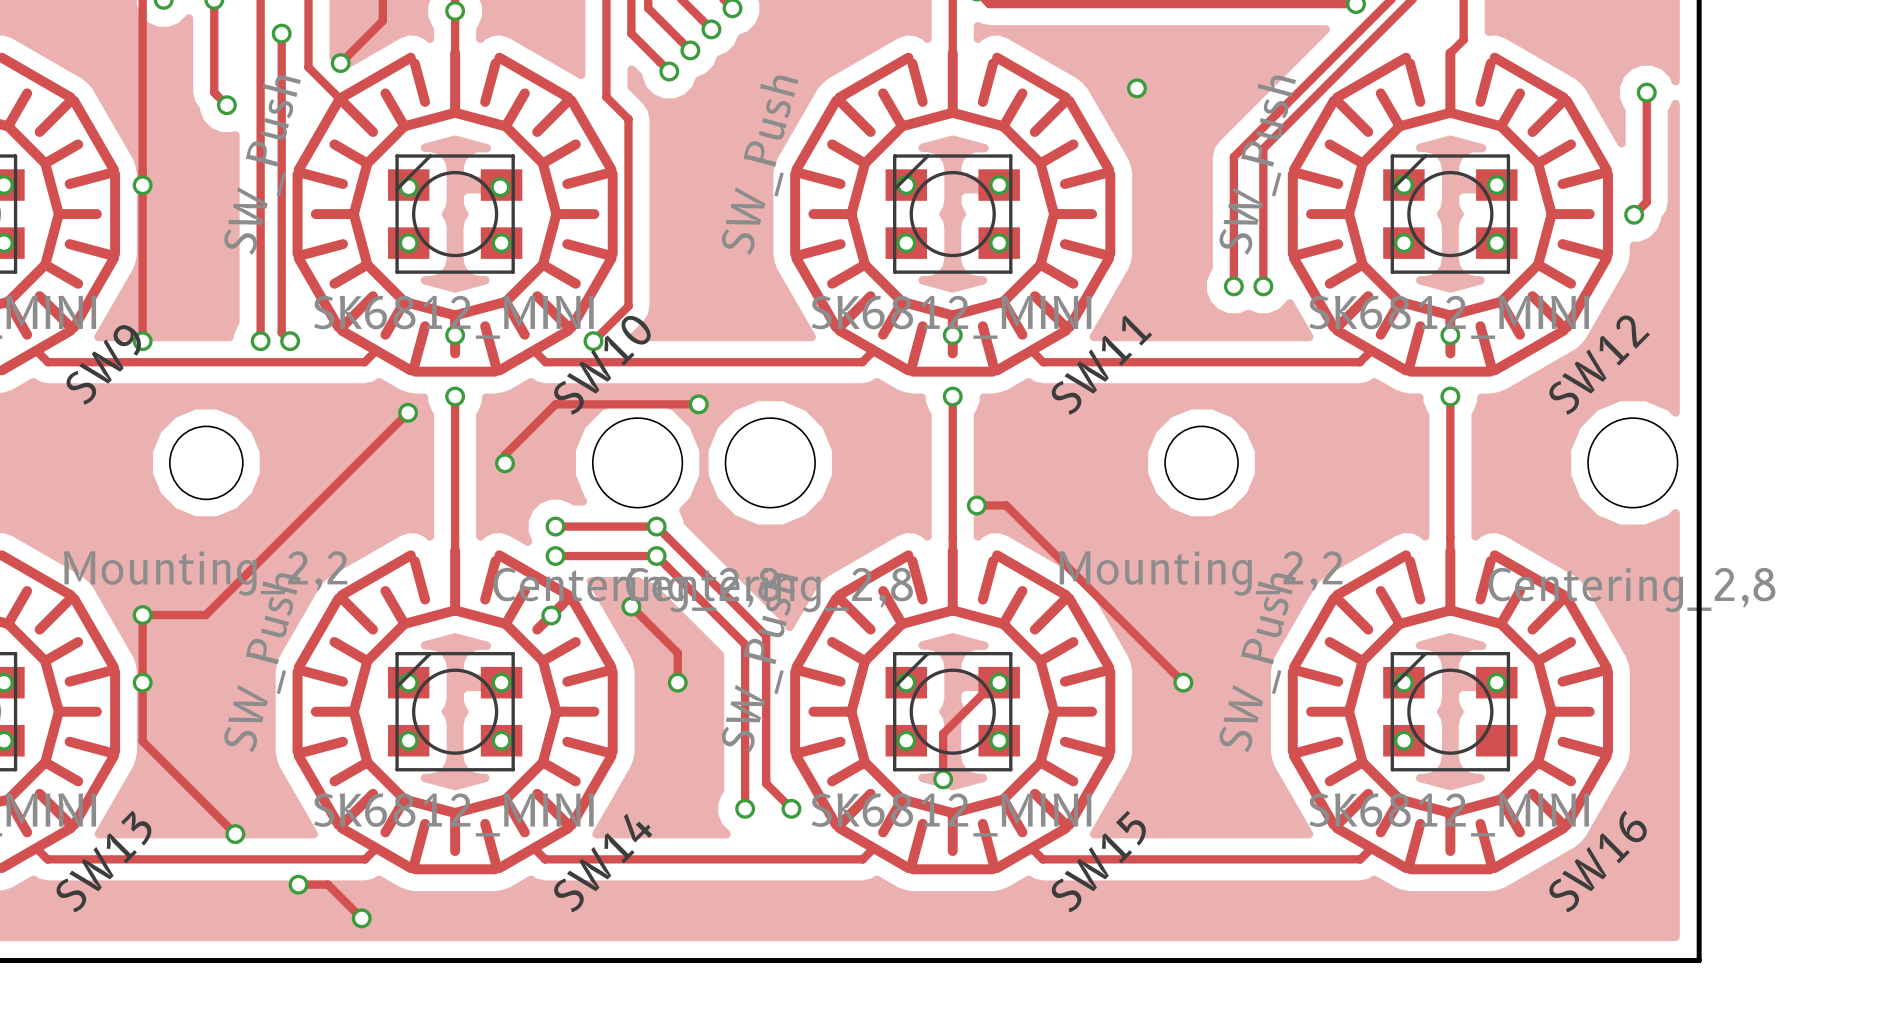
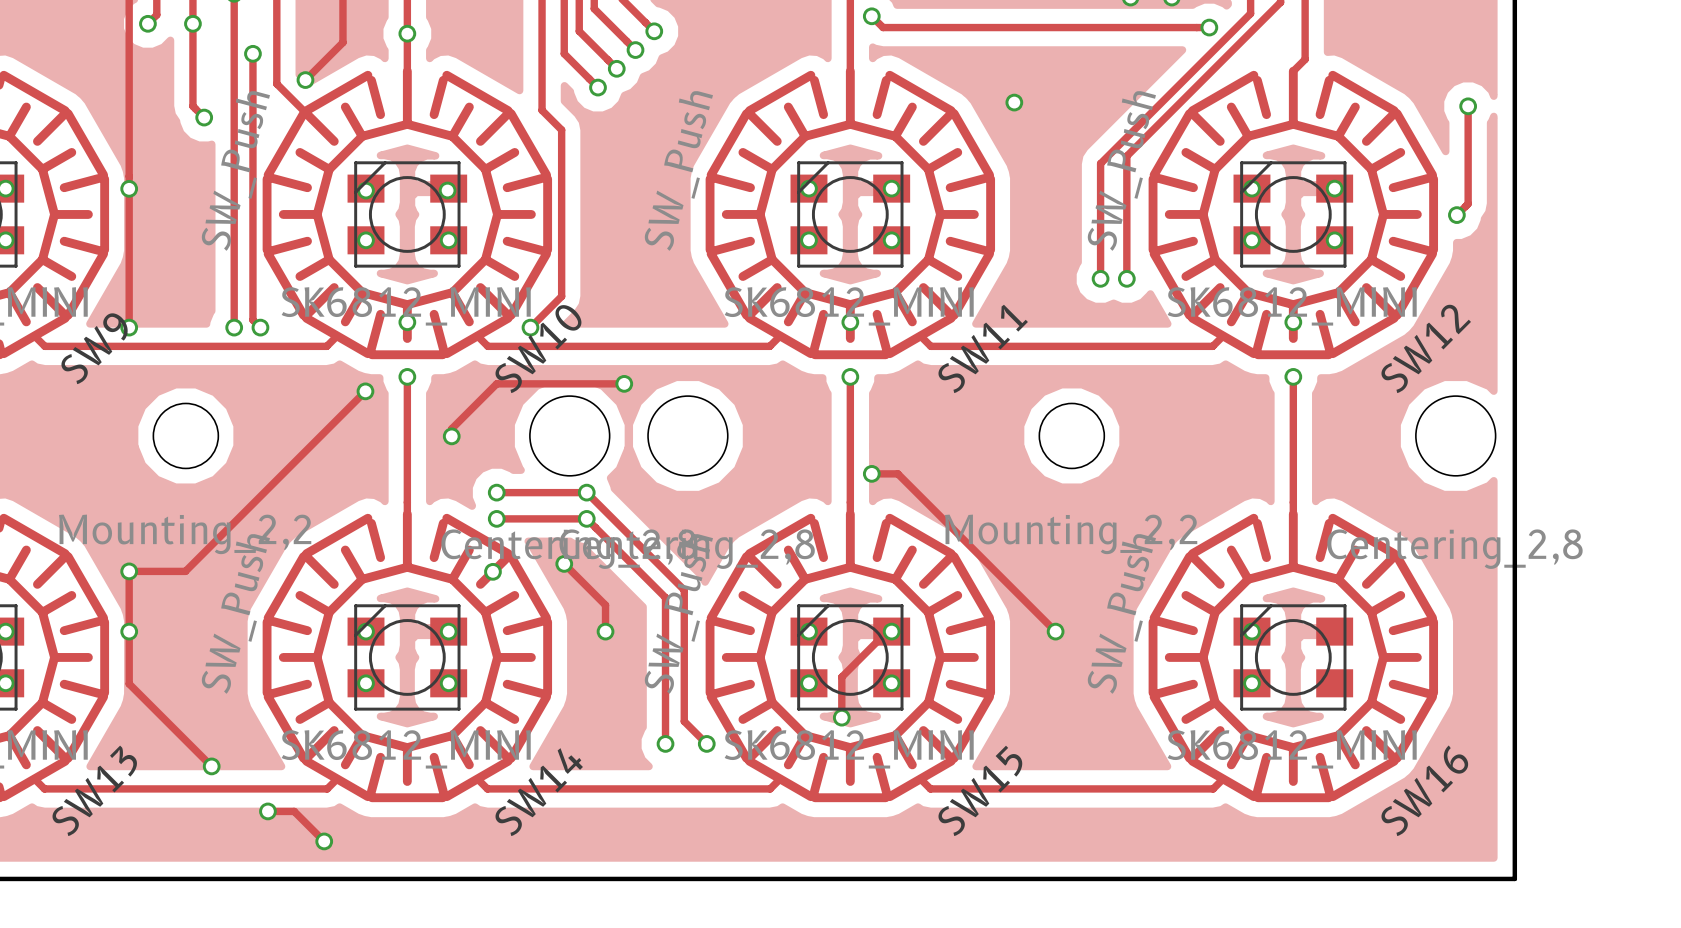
via: (1496, 682) -> none

